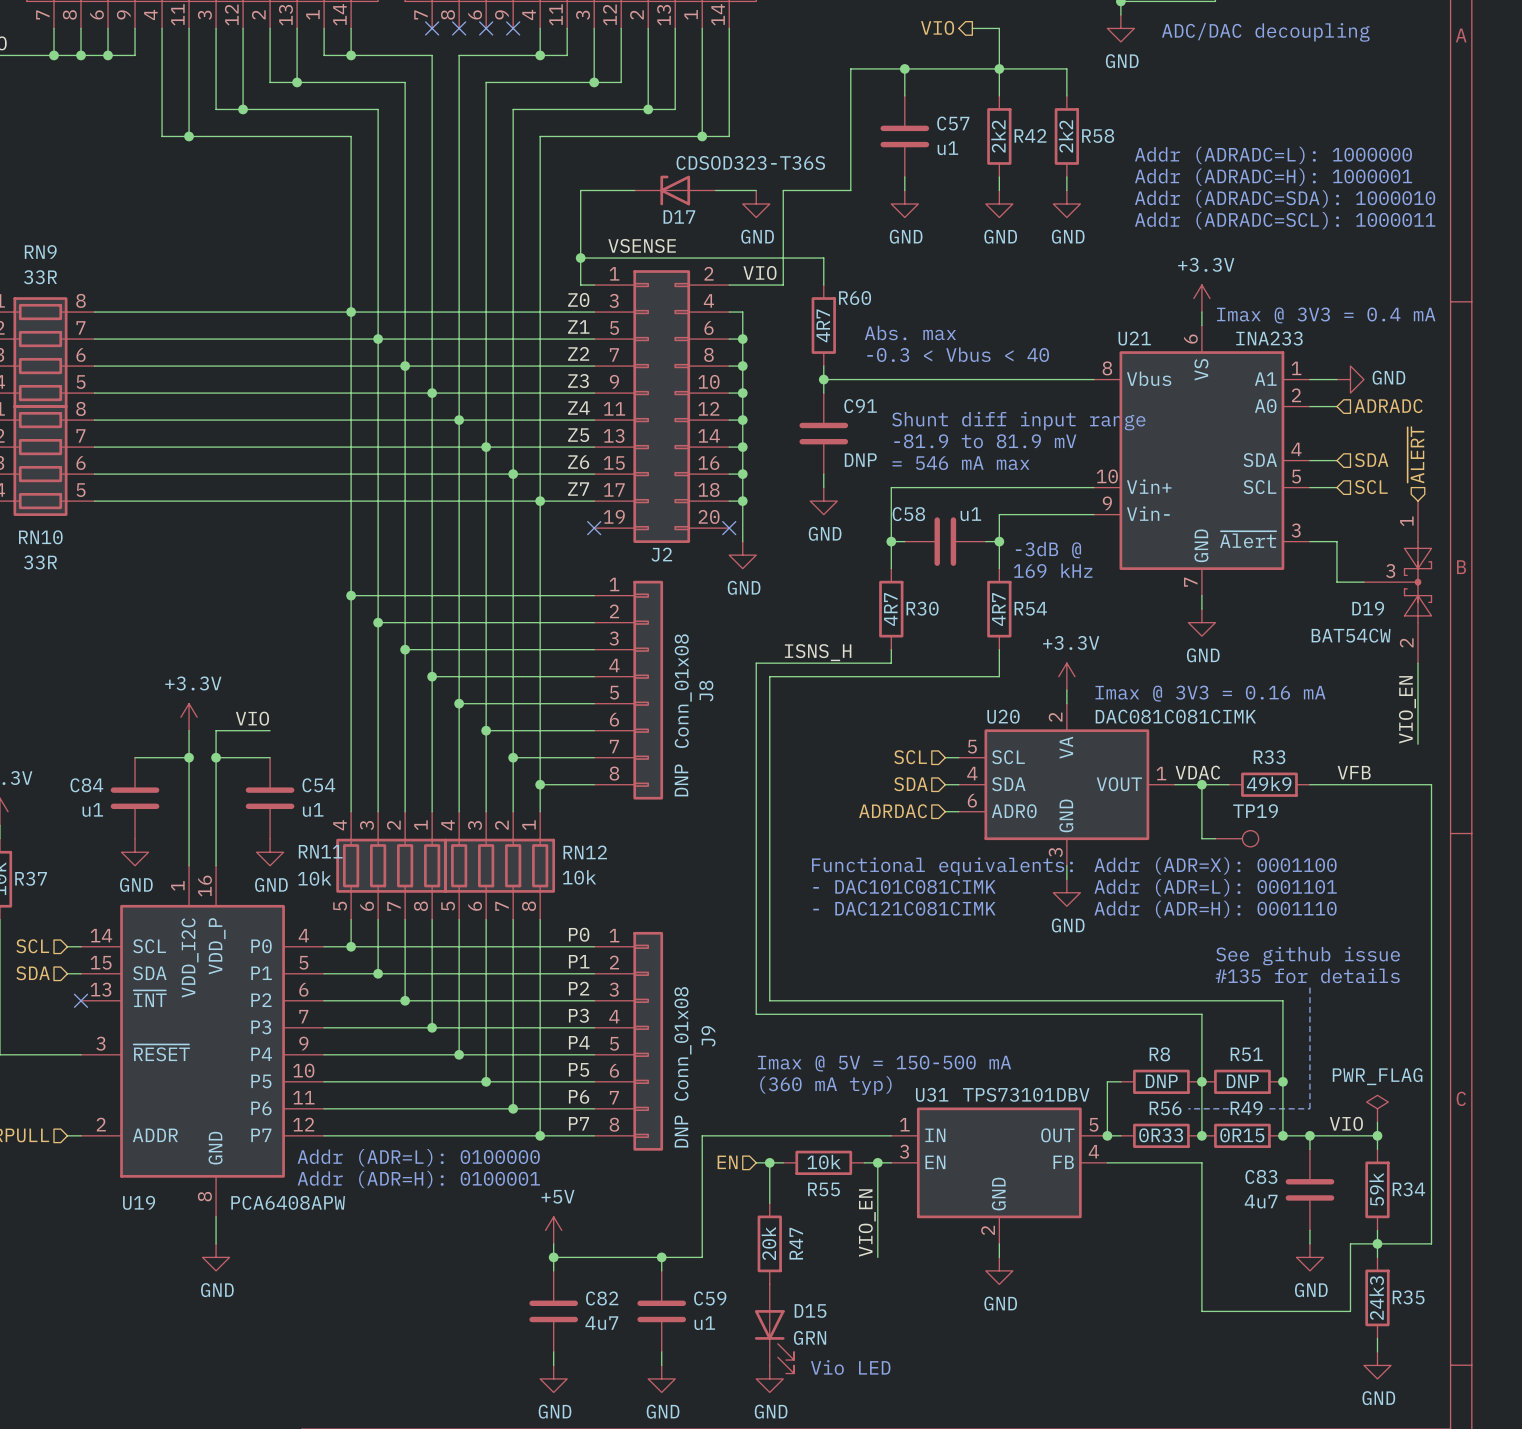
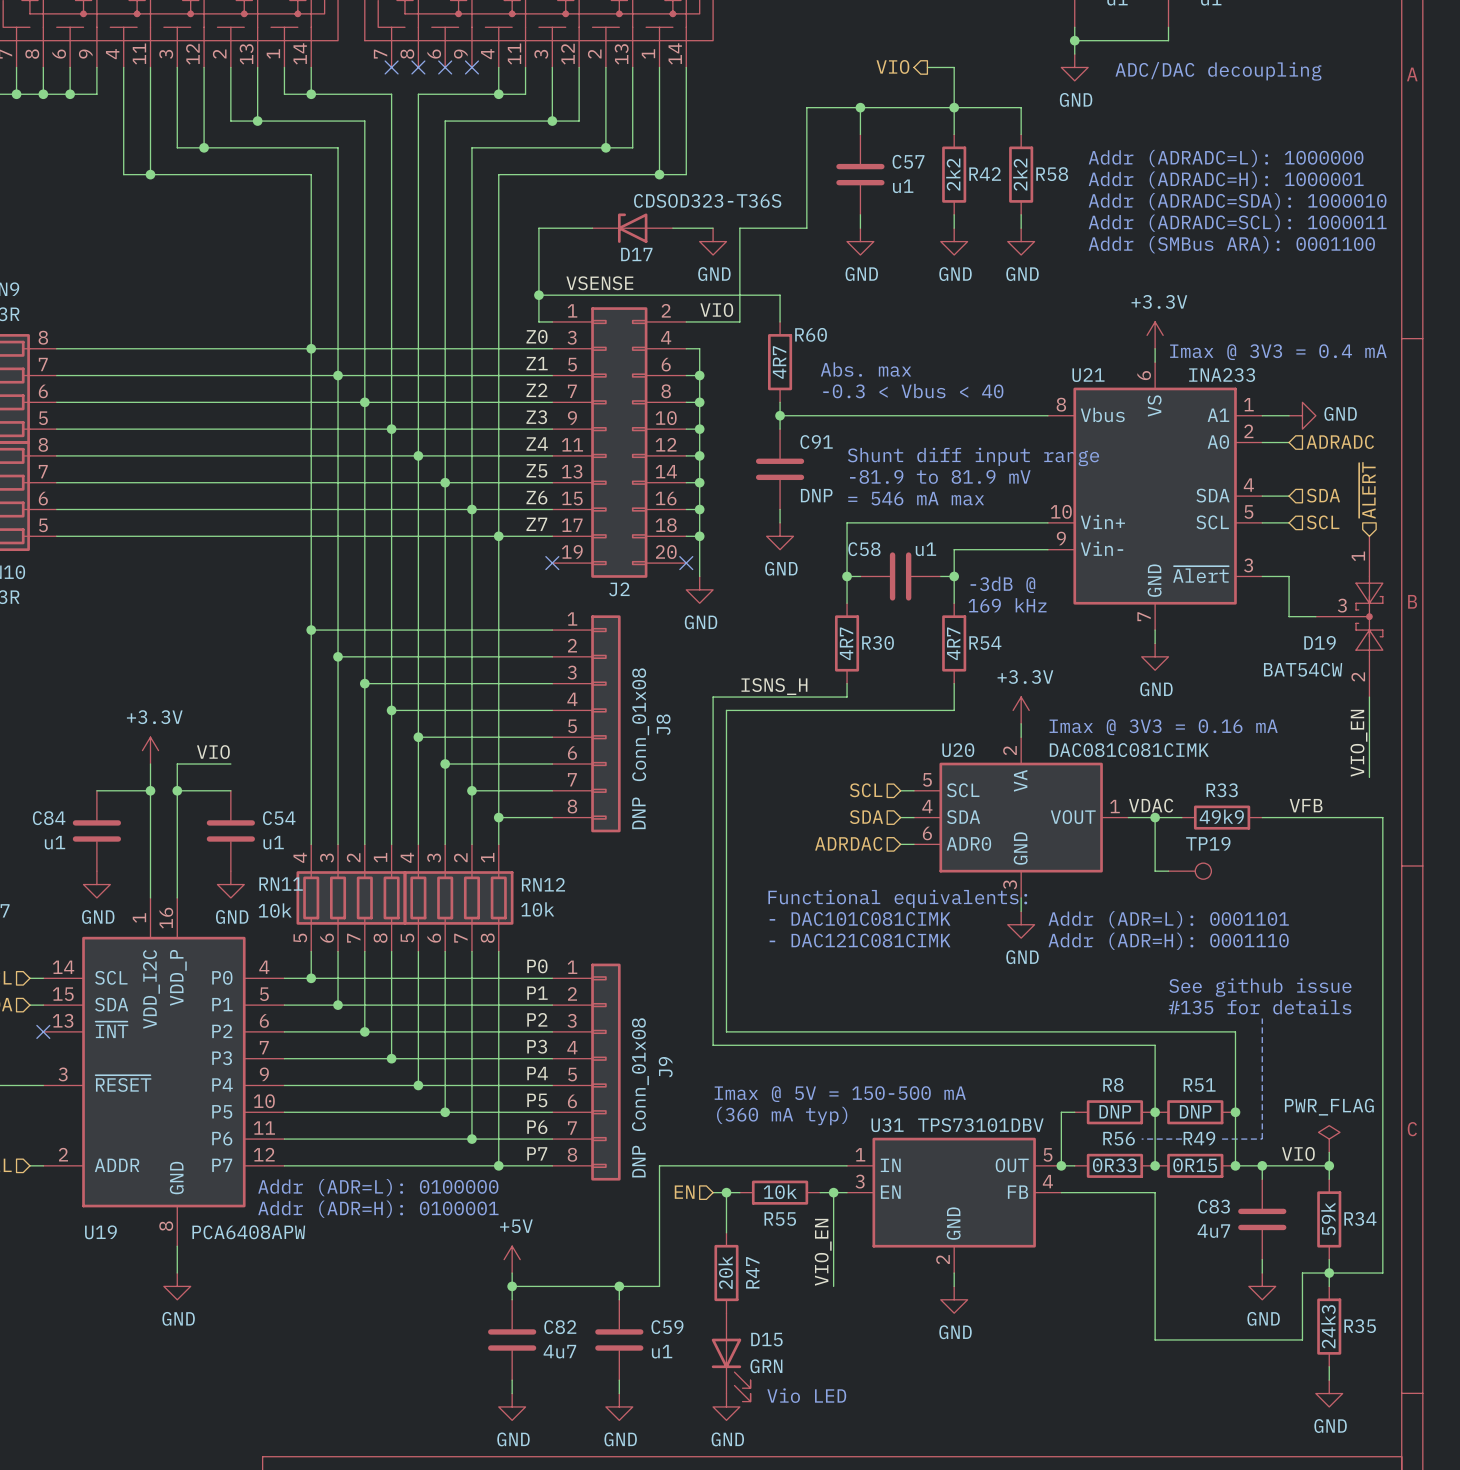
text position: Addr (ADRADC=L): 1000000 (1273, 155) -> Addr (ADRADC=L): 1000000 (1226, 158)
text position: Addr (ADRADC=H): 1000001 (1273, 177) -> Addr (ADRADC=H): 1000001 (1226, 180)
text position: Addr (ADRADC=SDA): 1000010 (1285, 198) -> Addr (ADRADC=SDA): 1000010 (1237, 201)
text: none -> Addr (SMBus ARA): 0001100 (1231, 244)
text position: Addr (ADRADC=SCL): 1000011 (1285, 220) -> Addr (ADRADC=SCL): 1000011 (1237, 223)
text: Addr (ADR=X): 0001100 (1215, 865) -> none

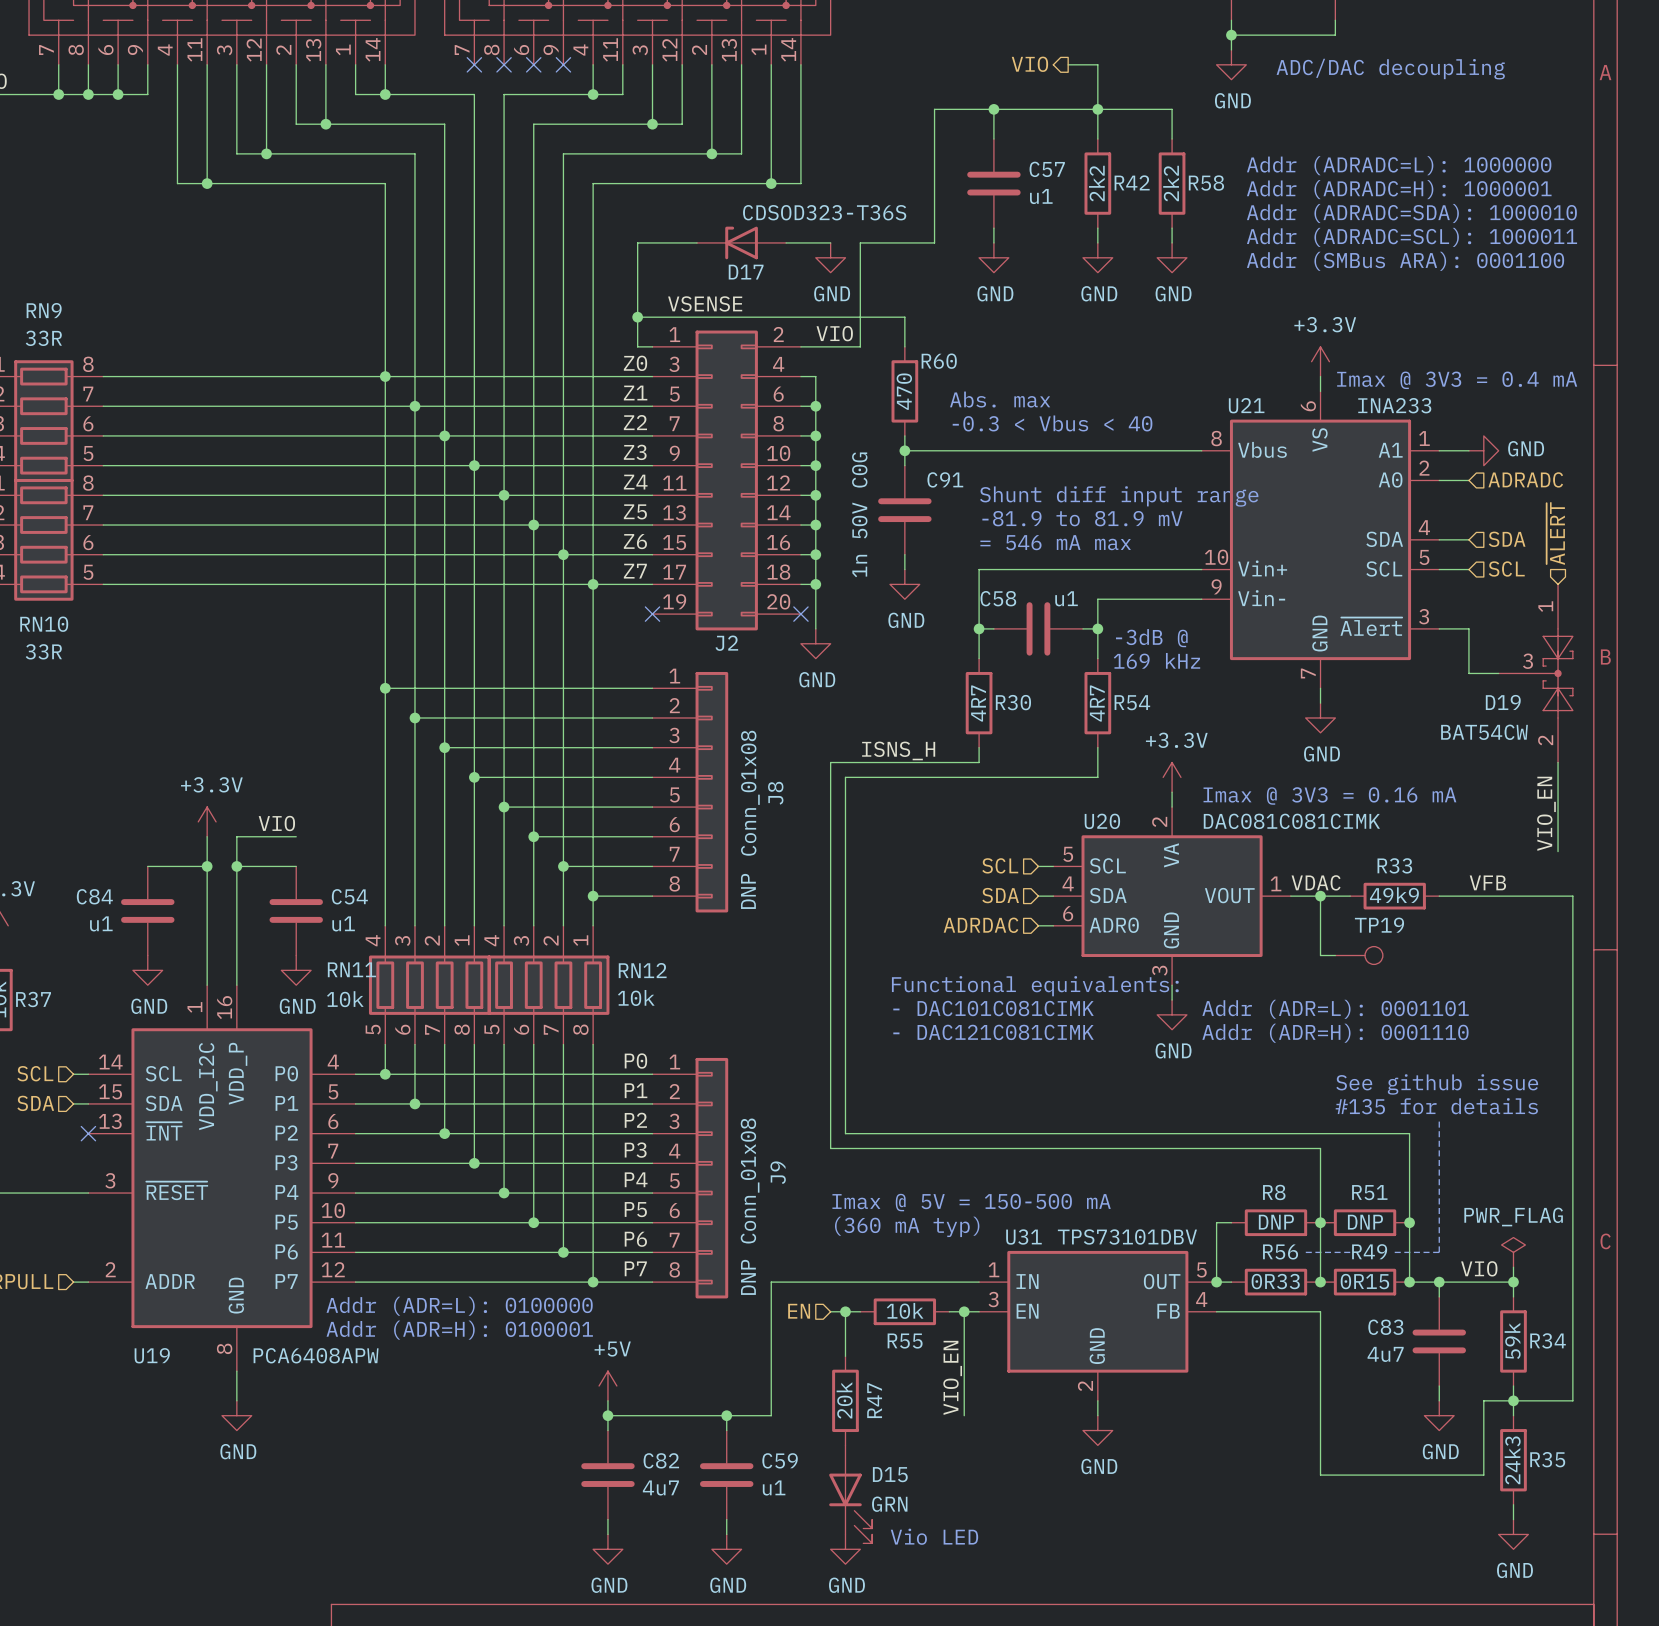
R60 value: 4R7 (779, 362) -> 470 (904, 391)
C91 value: DNP (816, 495) -> 1n 50V C0G (859, 514)

